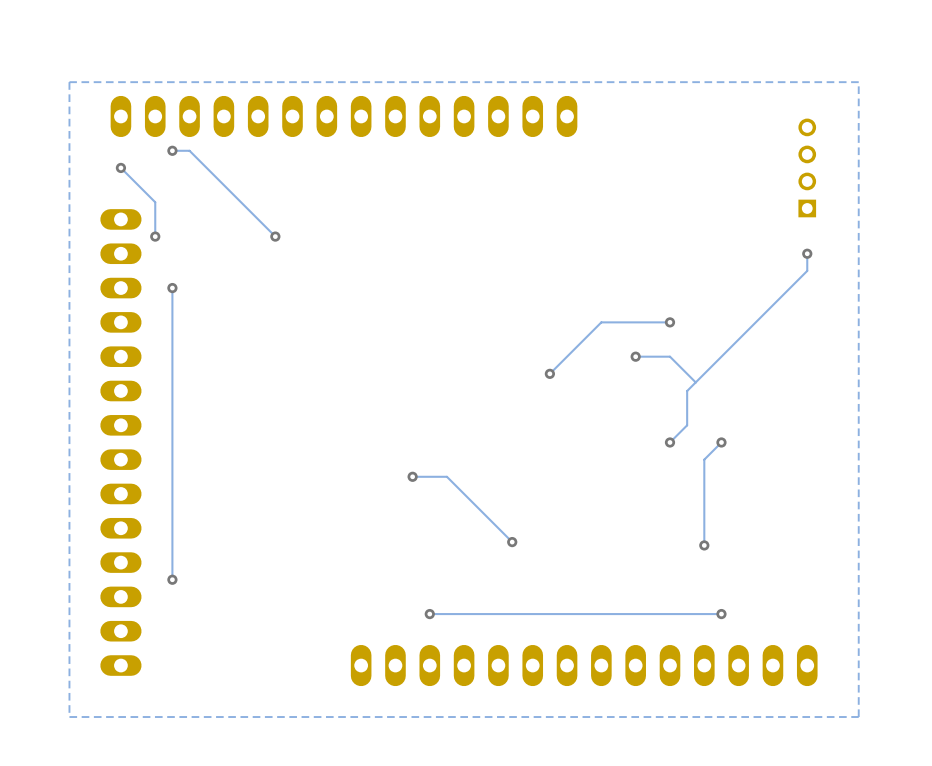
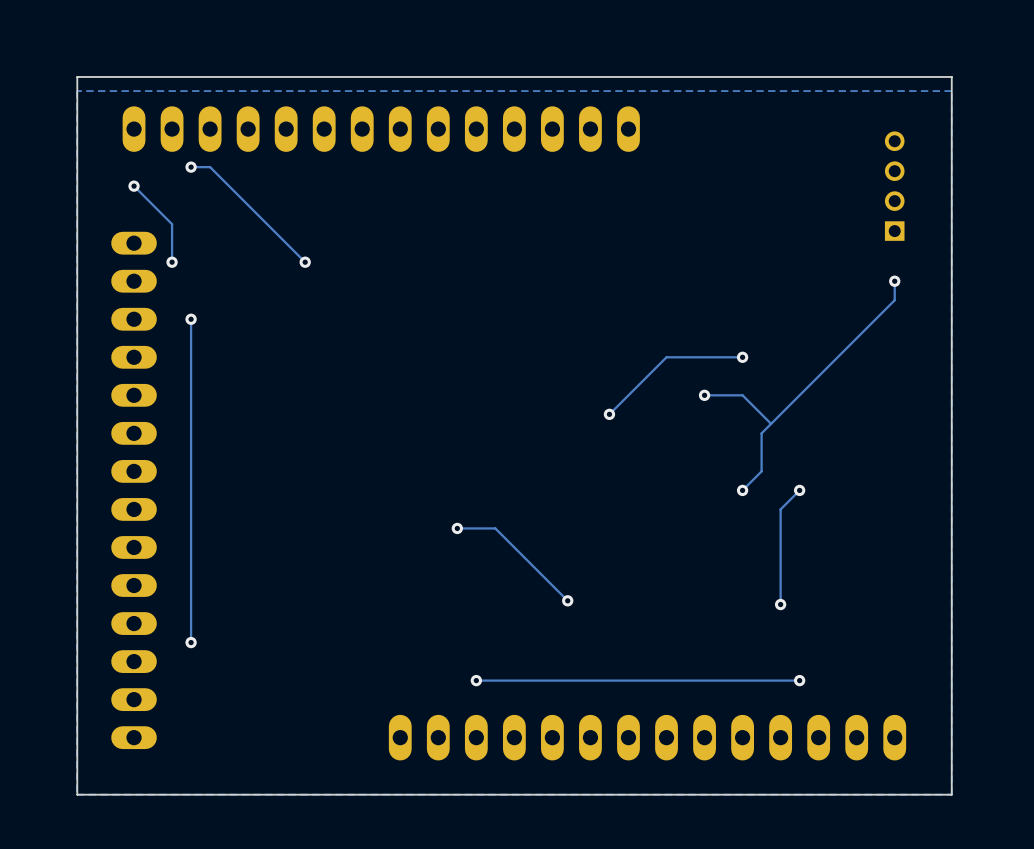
board edge: none -> (951, 76) (77, 76) (77, 794) (951, 794) (951, 76)

